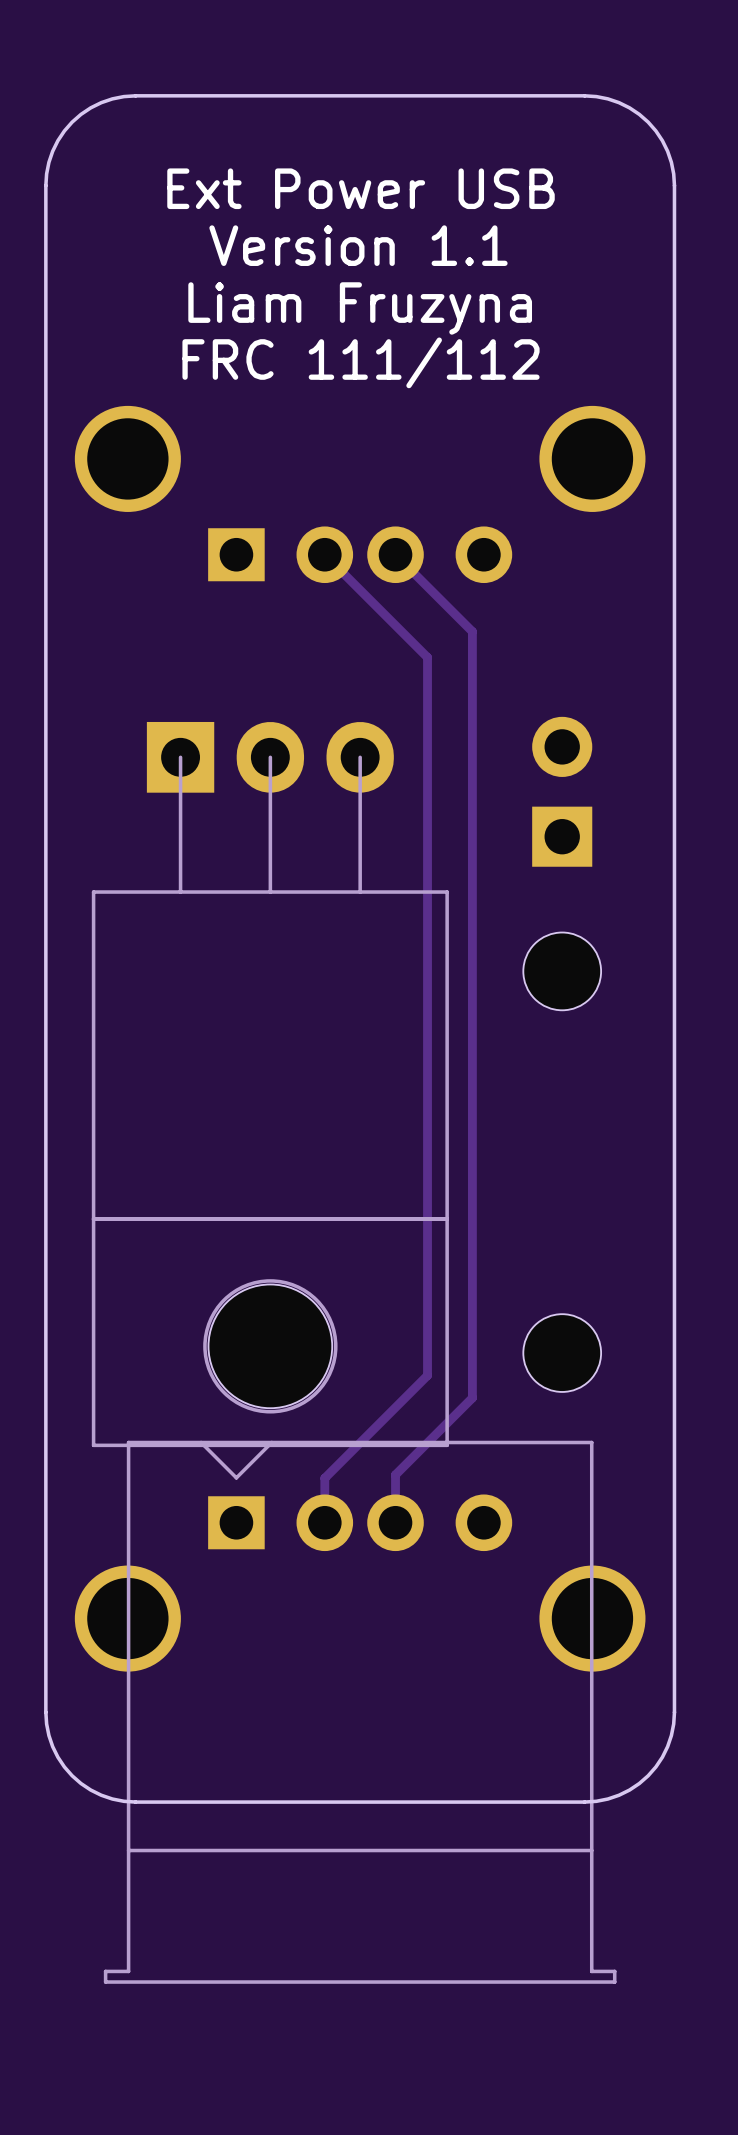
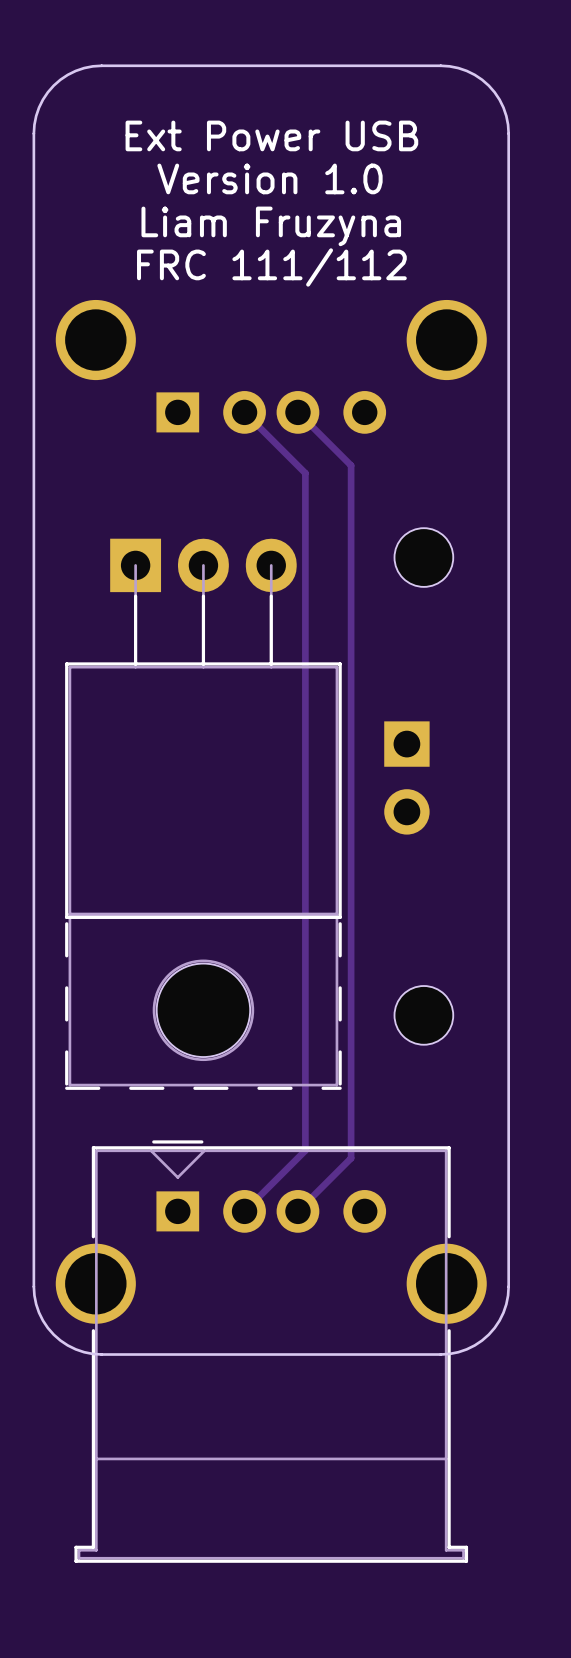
text: Version 1.1 (358, 245) -> Version 1.0 (269, 178)
track: (465, 625) (472, 631) (472, 1397) (395, 1474) (395, 1522) -> (351, 465) (351, 1158) (297, 1211)
track: (405, 635) (427, 657) (427, 1375) (324, 1478) (324, 1522) -> (305, 473) (305, 1150) (244, 1211)
part footprint: [91, 721, 449, 1448] -> [65, 538, 342, 1090]
part rotation: 0° (562, 791) -> 180° (406, 777)
part position: (562, 791) -> (406, 777)
part position: (562, 971) -> (423, 557)
part: (360, 1712) -> none
part: none -> (271, 1351)

